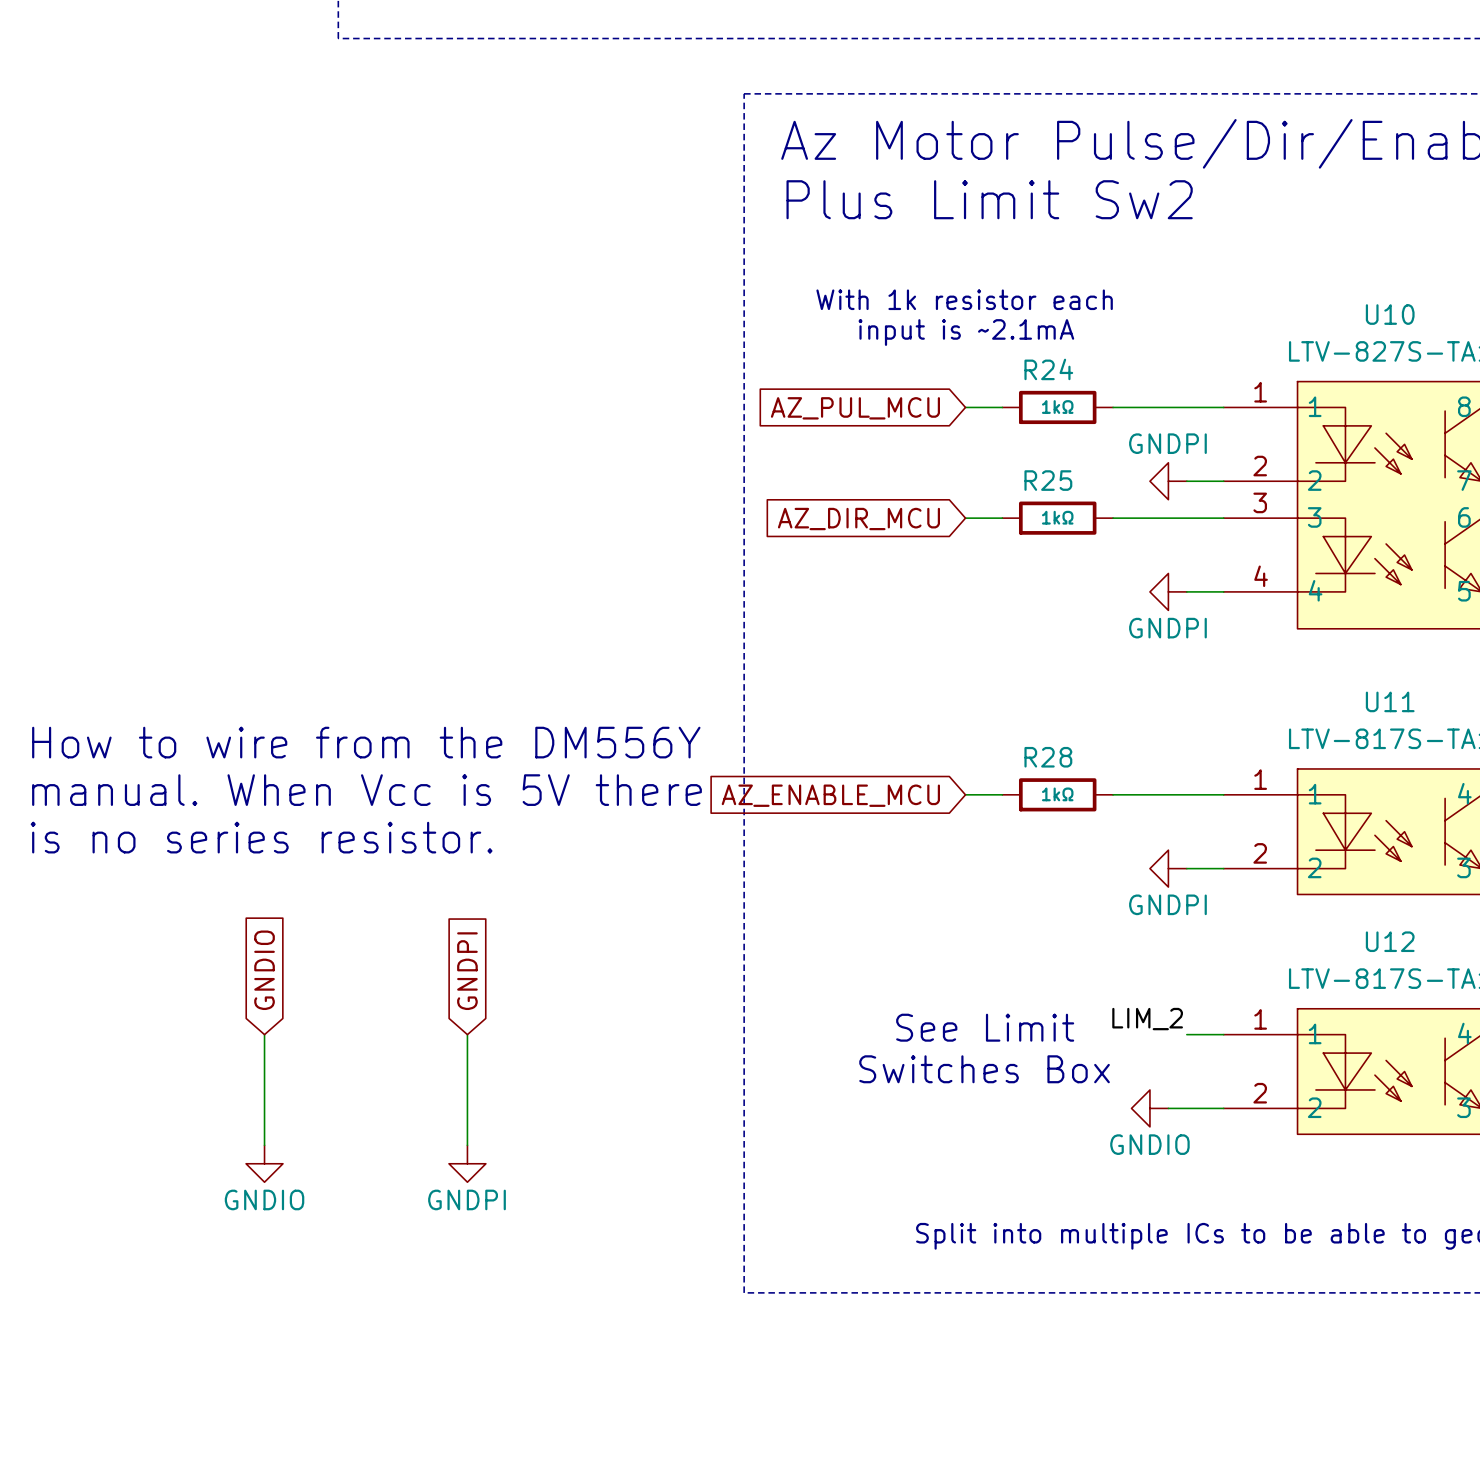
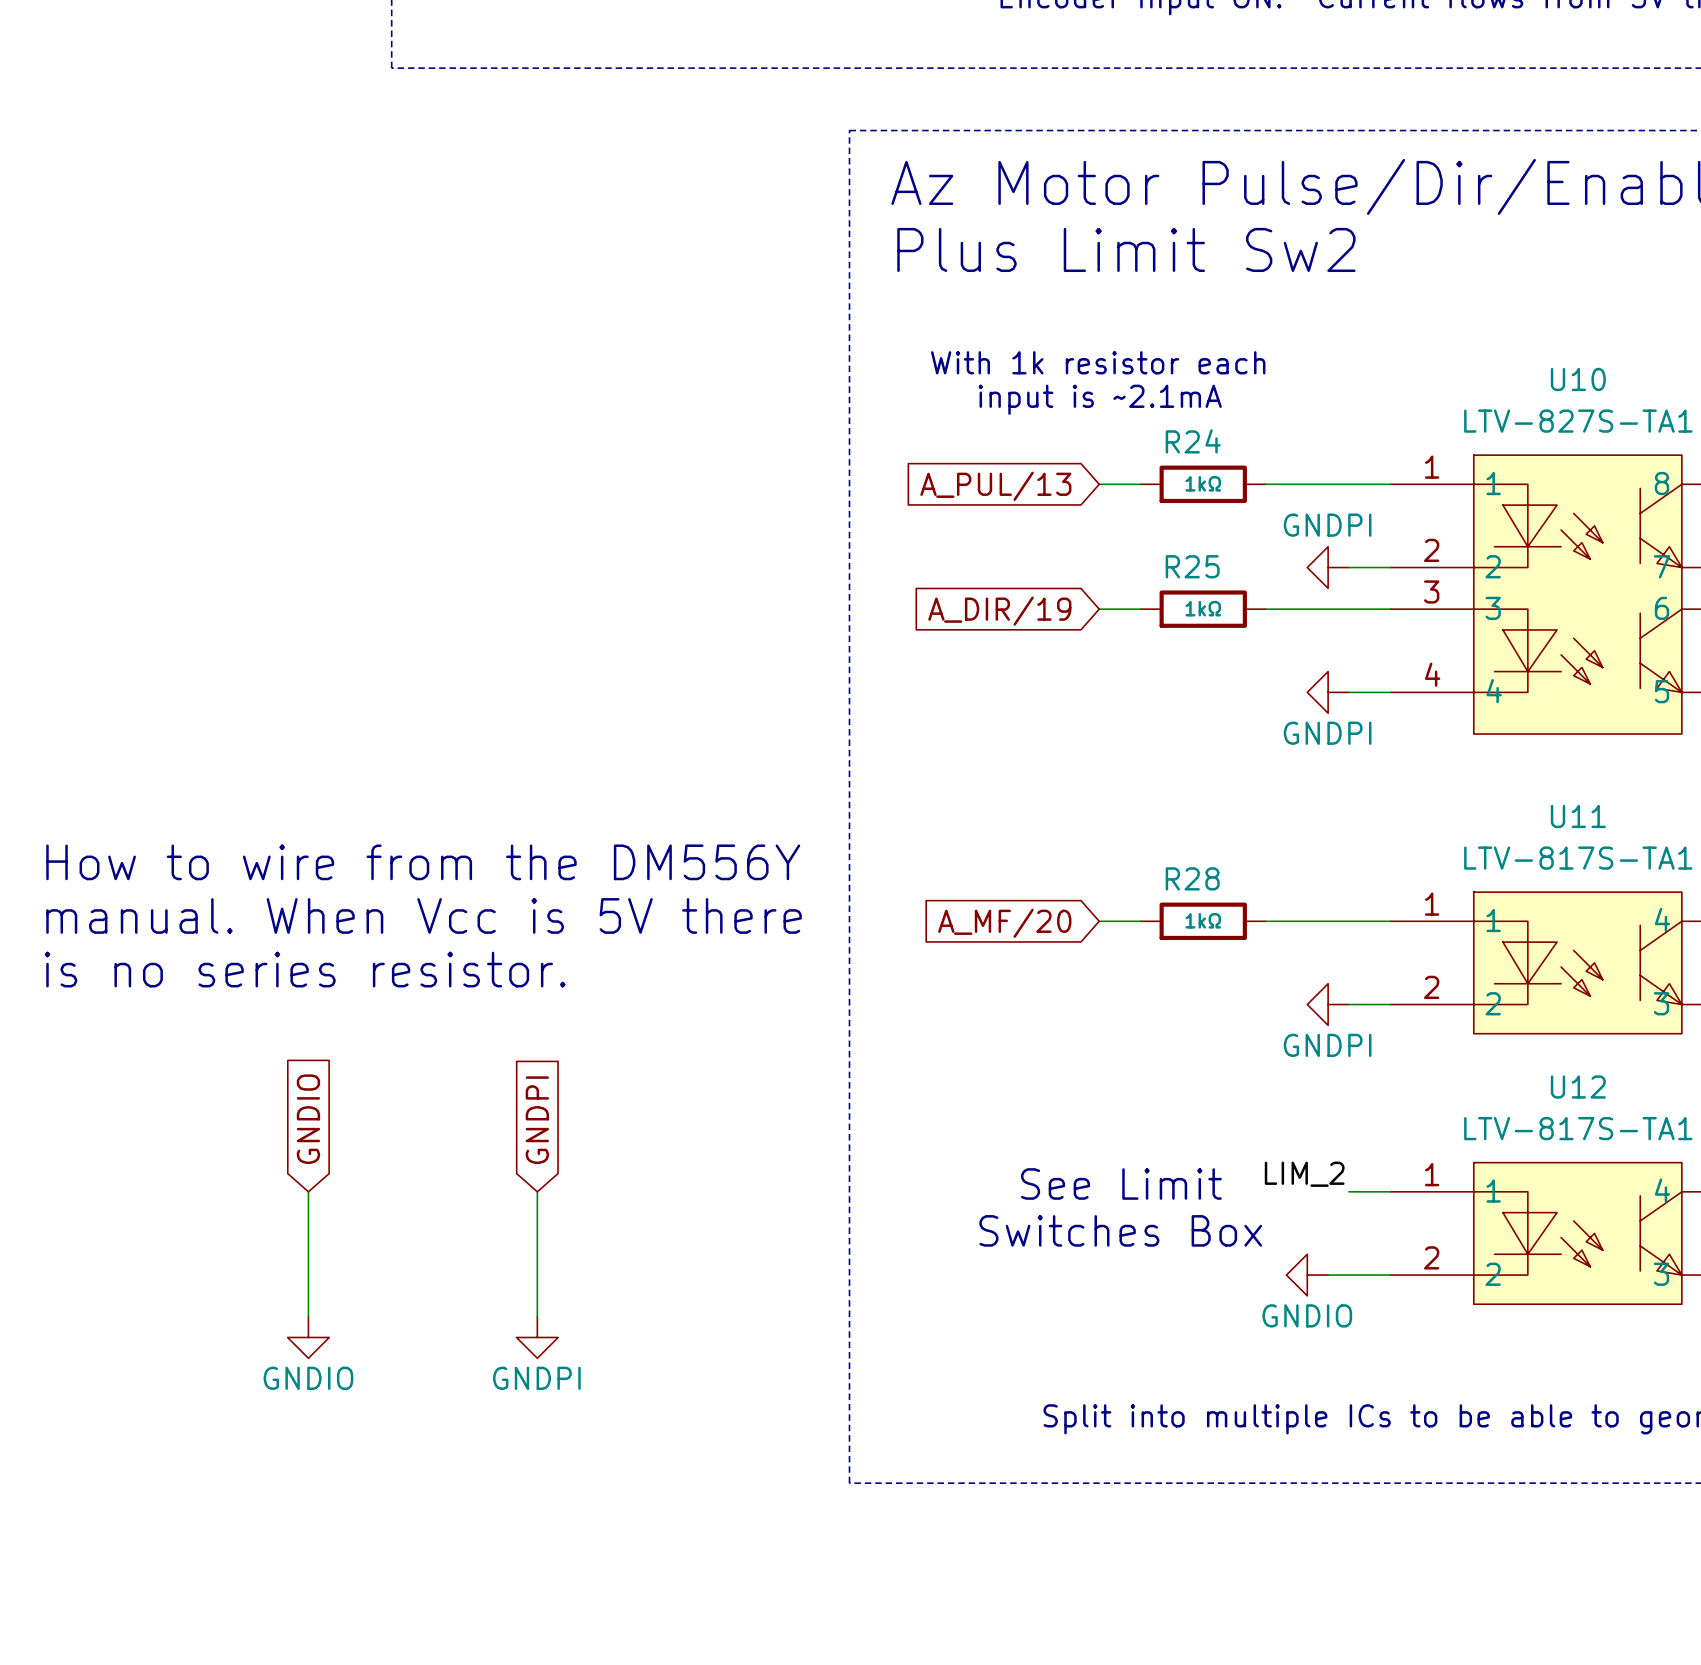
global label: AZ_PUL_MCU (855, 408) -> A_PUL/13 (995, 486)
global label: AZ_DIR_MCU (858, 519) -> A_DIR/19 (999, 611)
global label: AZ_ENABLE_MCU (830, 795) -> A_MF/20 (1004, 923)

